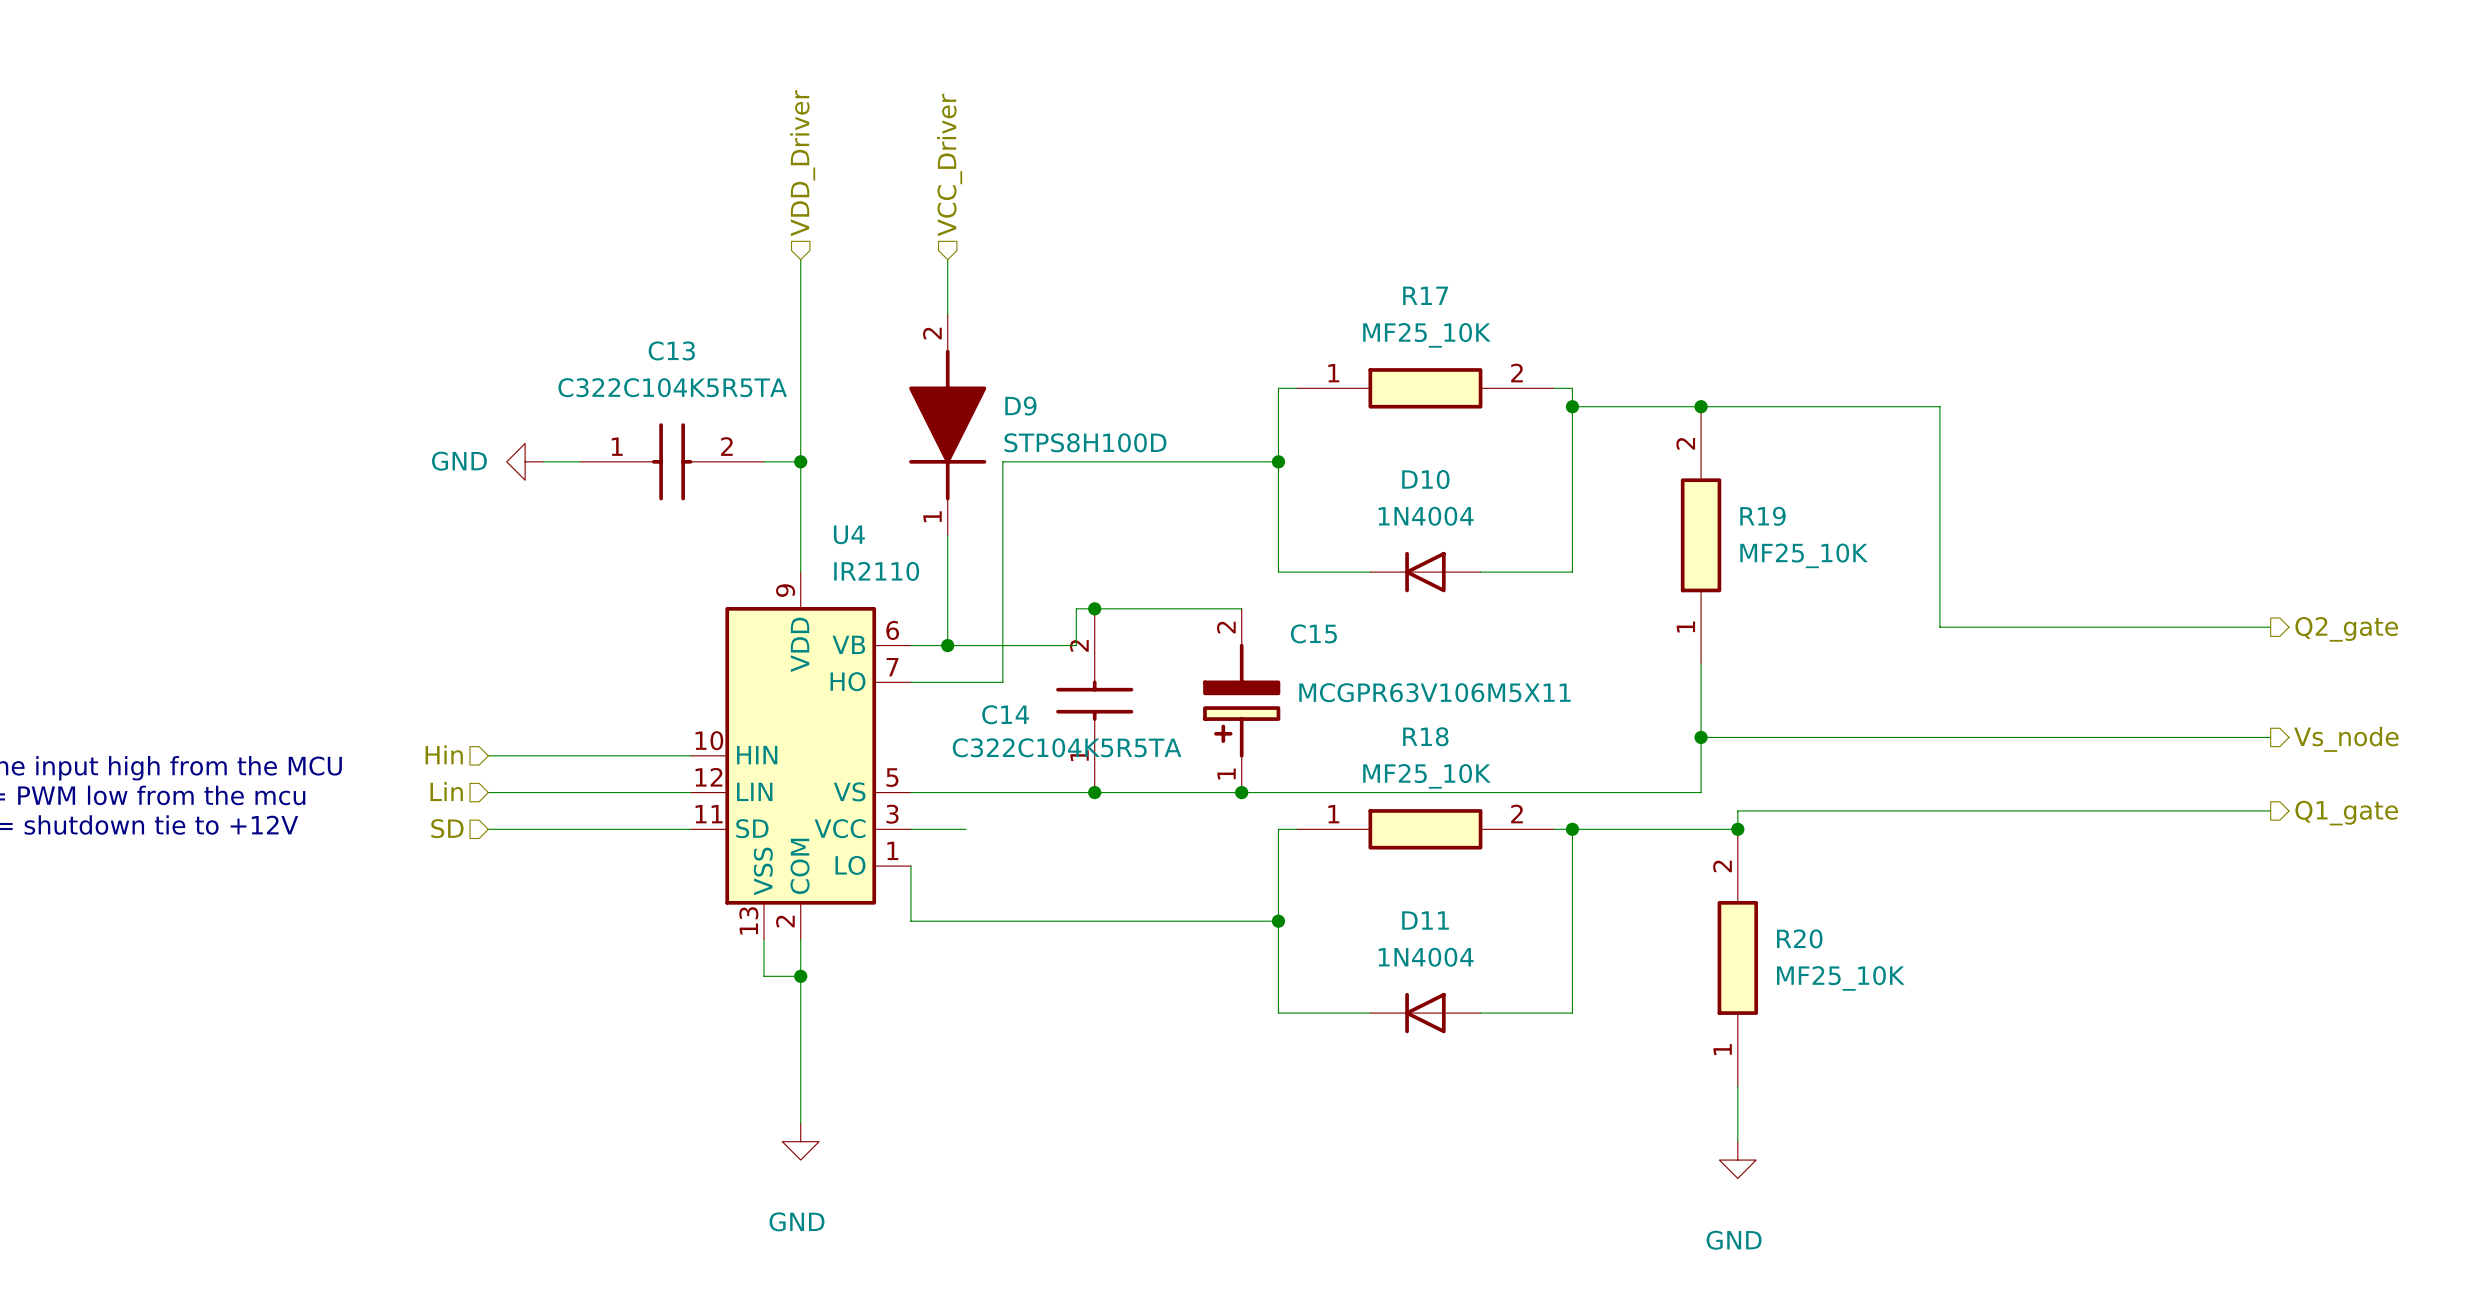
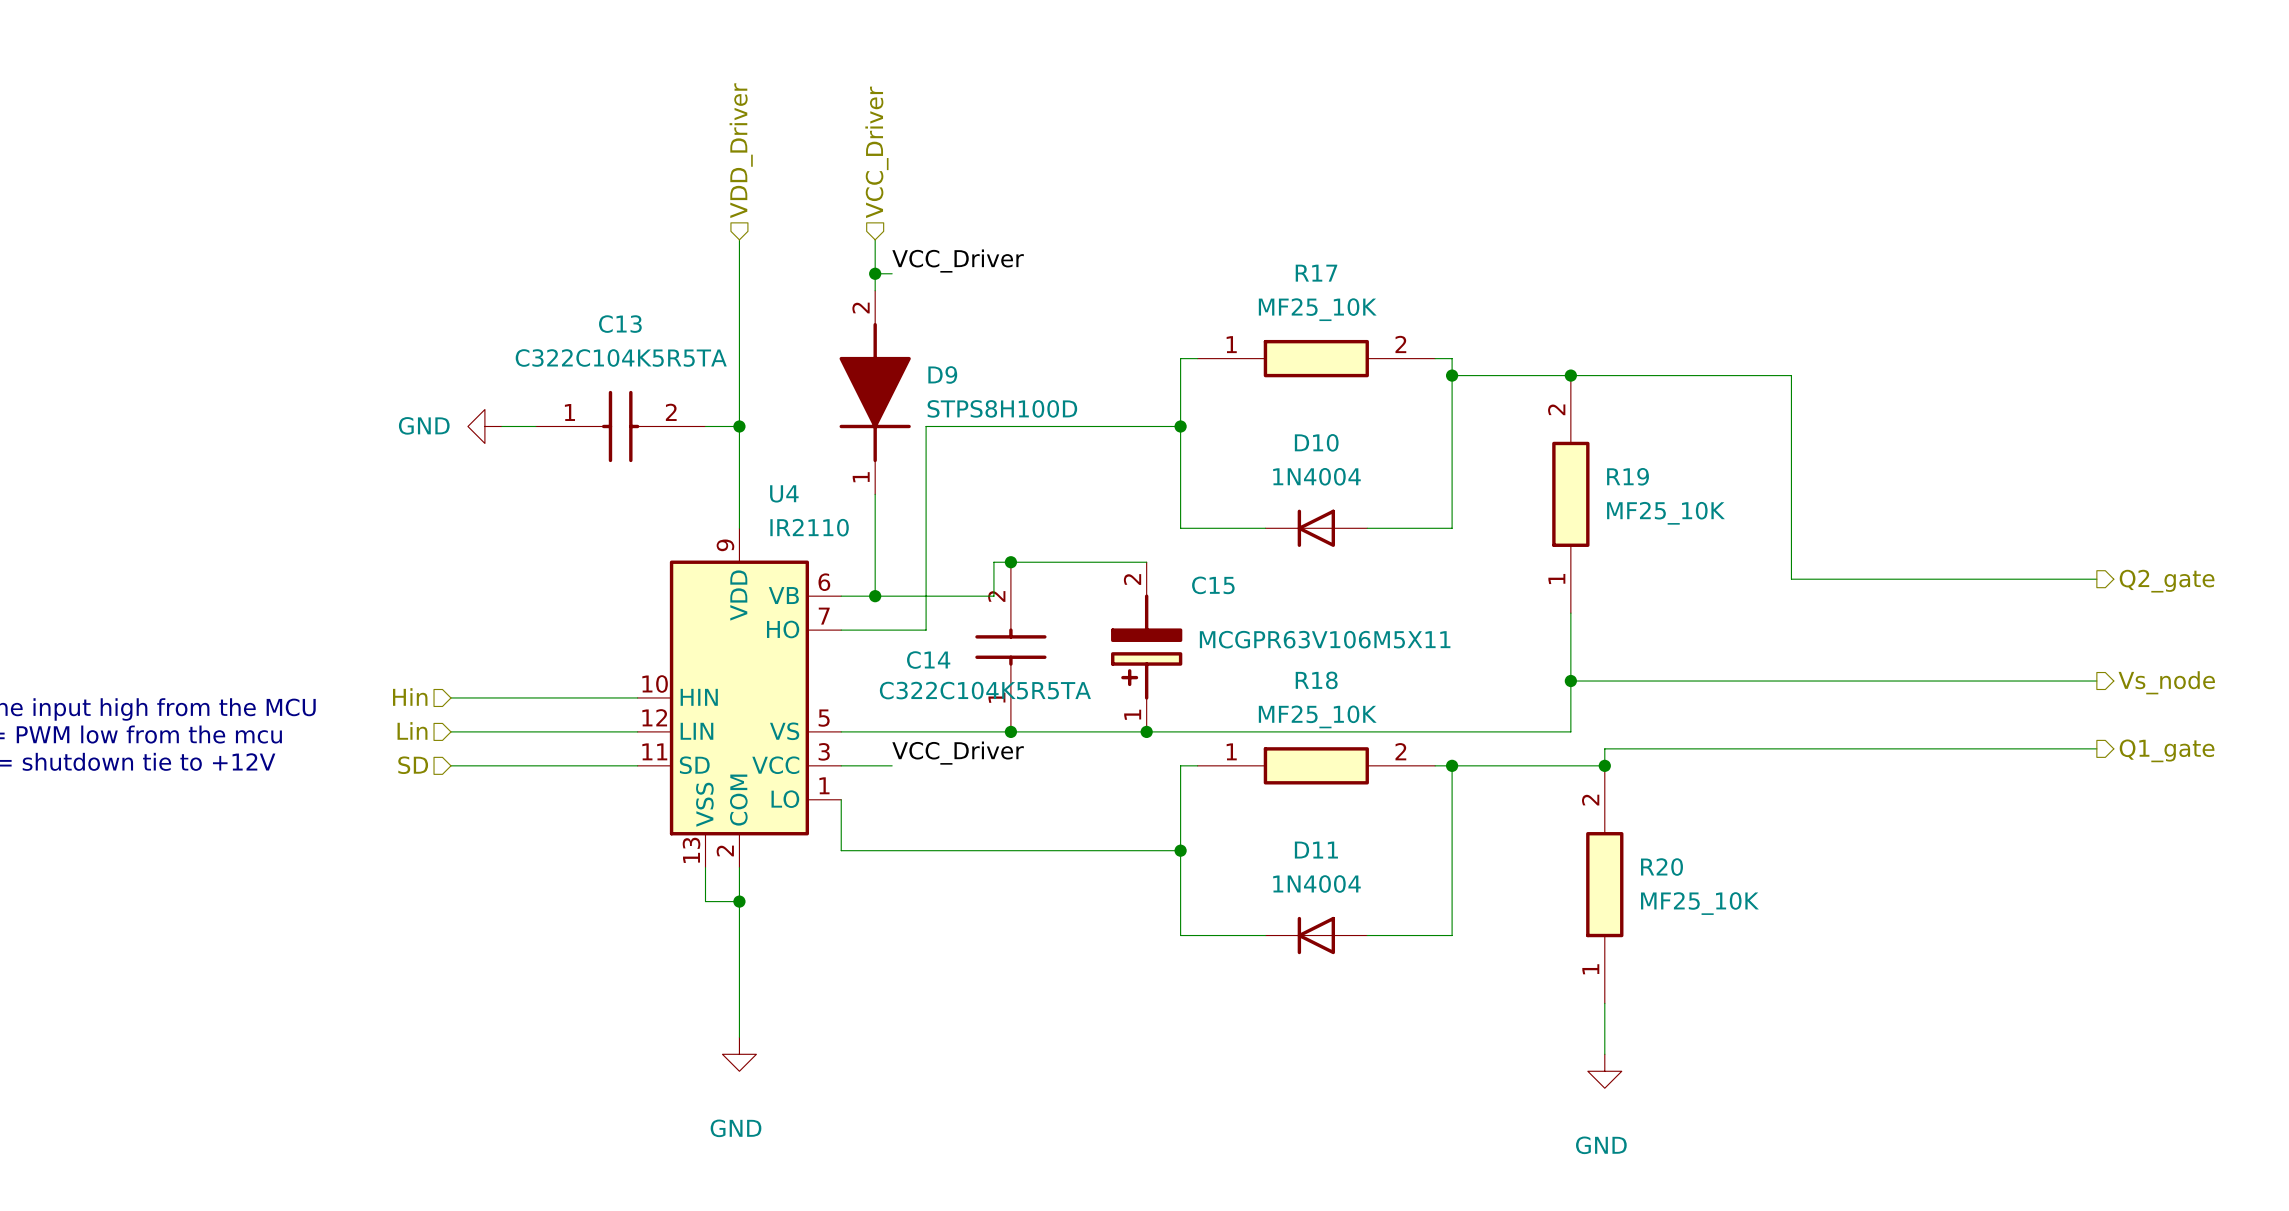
label: none -> VCC_Driver (958, 261)
wire: none -> (875, 273) (892, 273)
junction: none -> (875, 273)
label: none -> VCC_Driver (958, 753)

